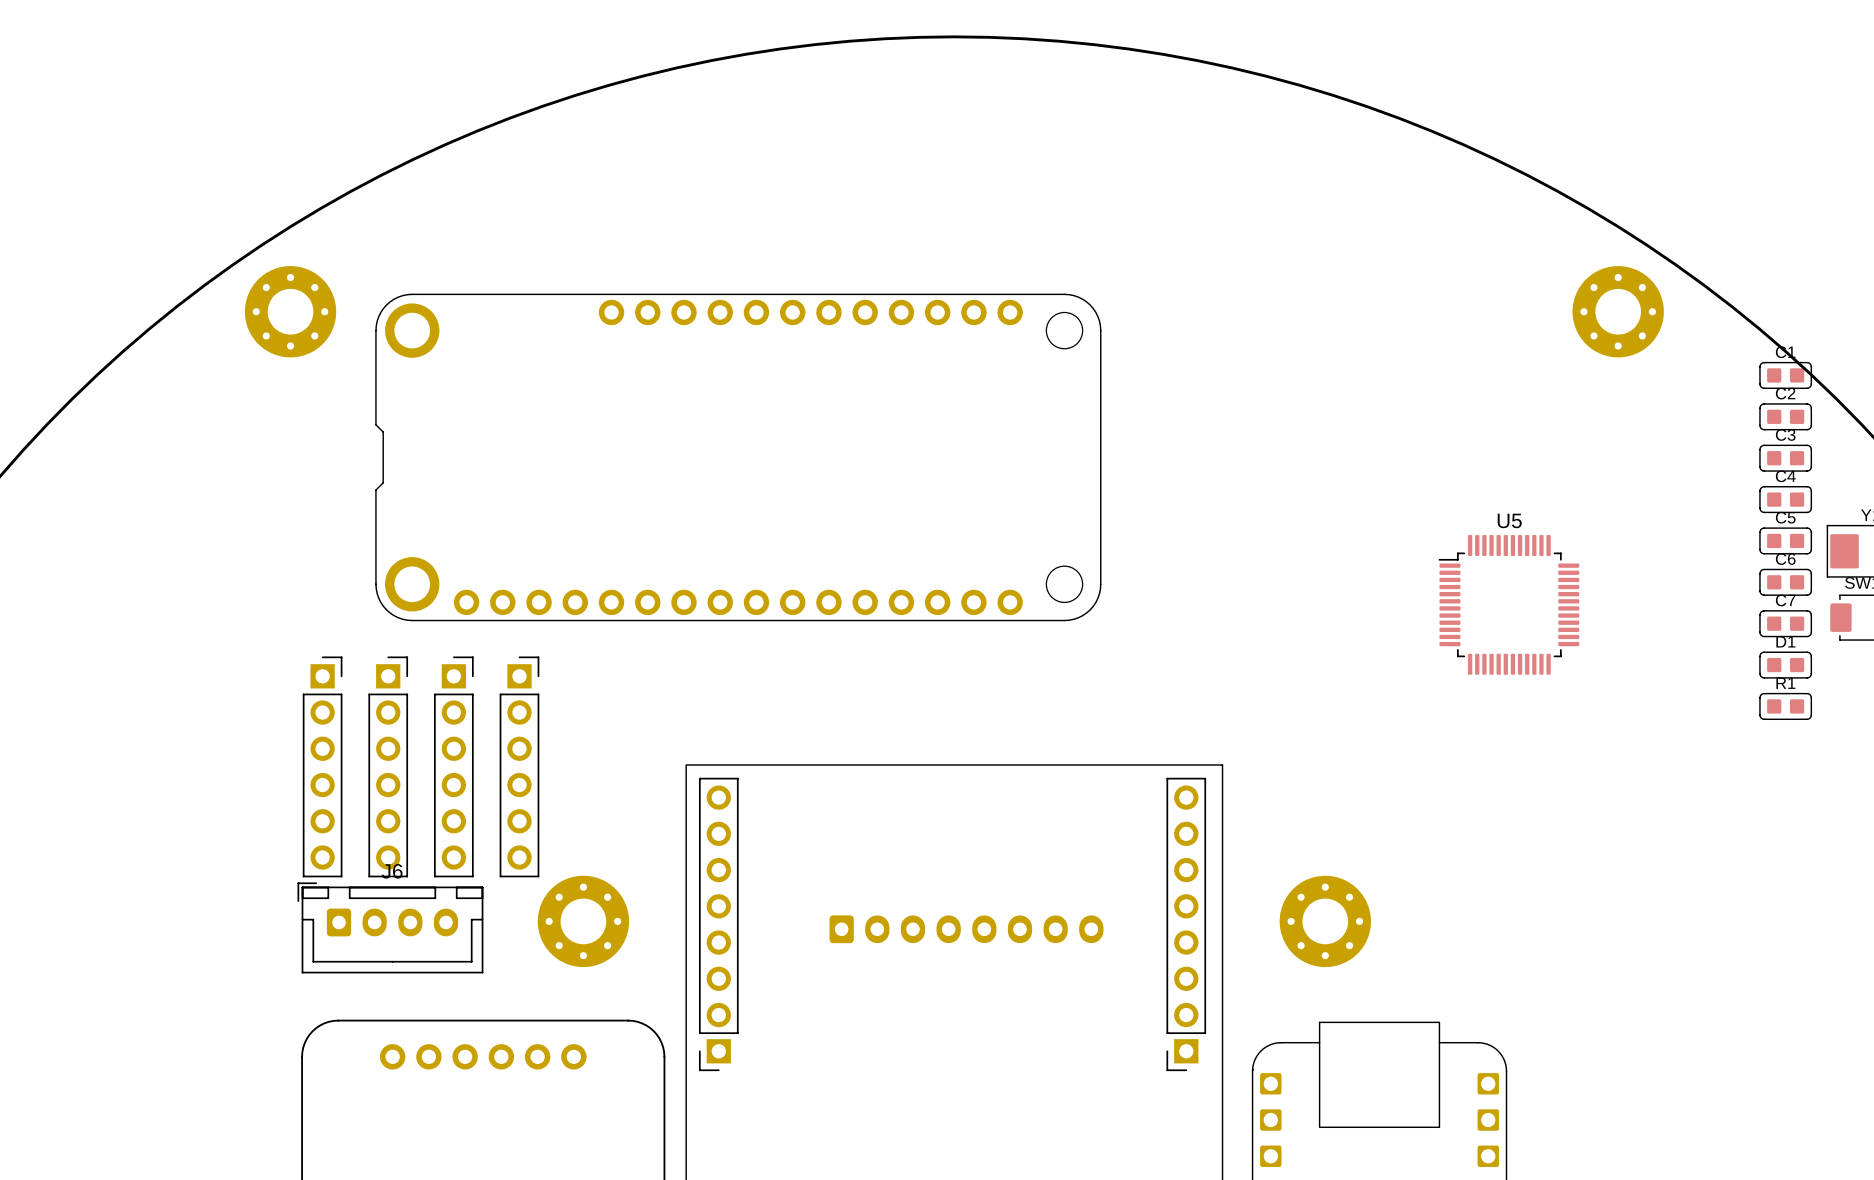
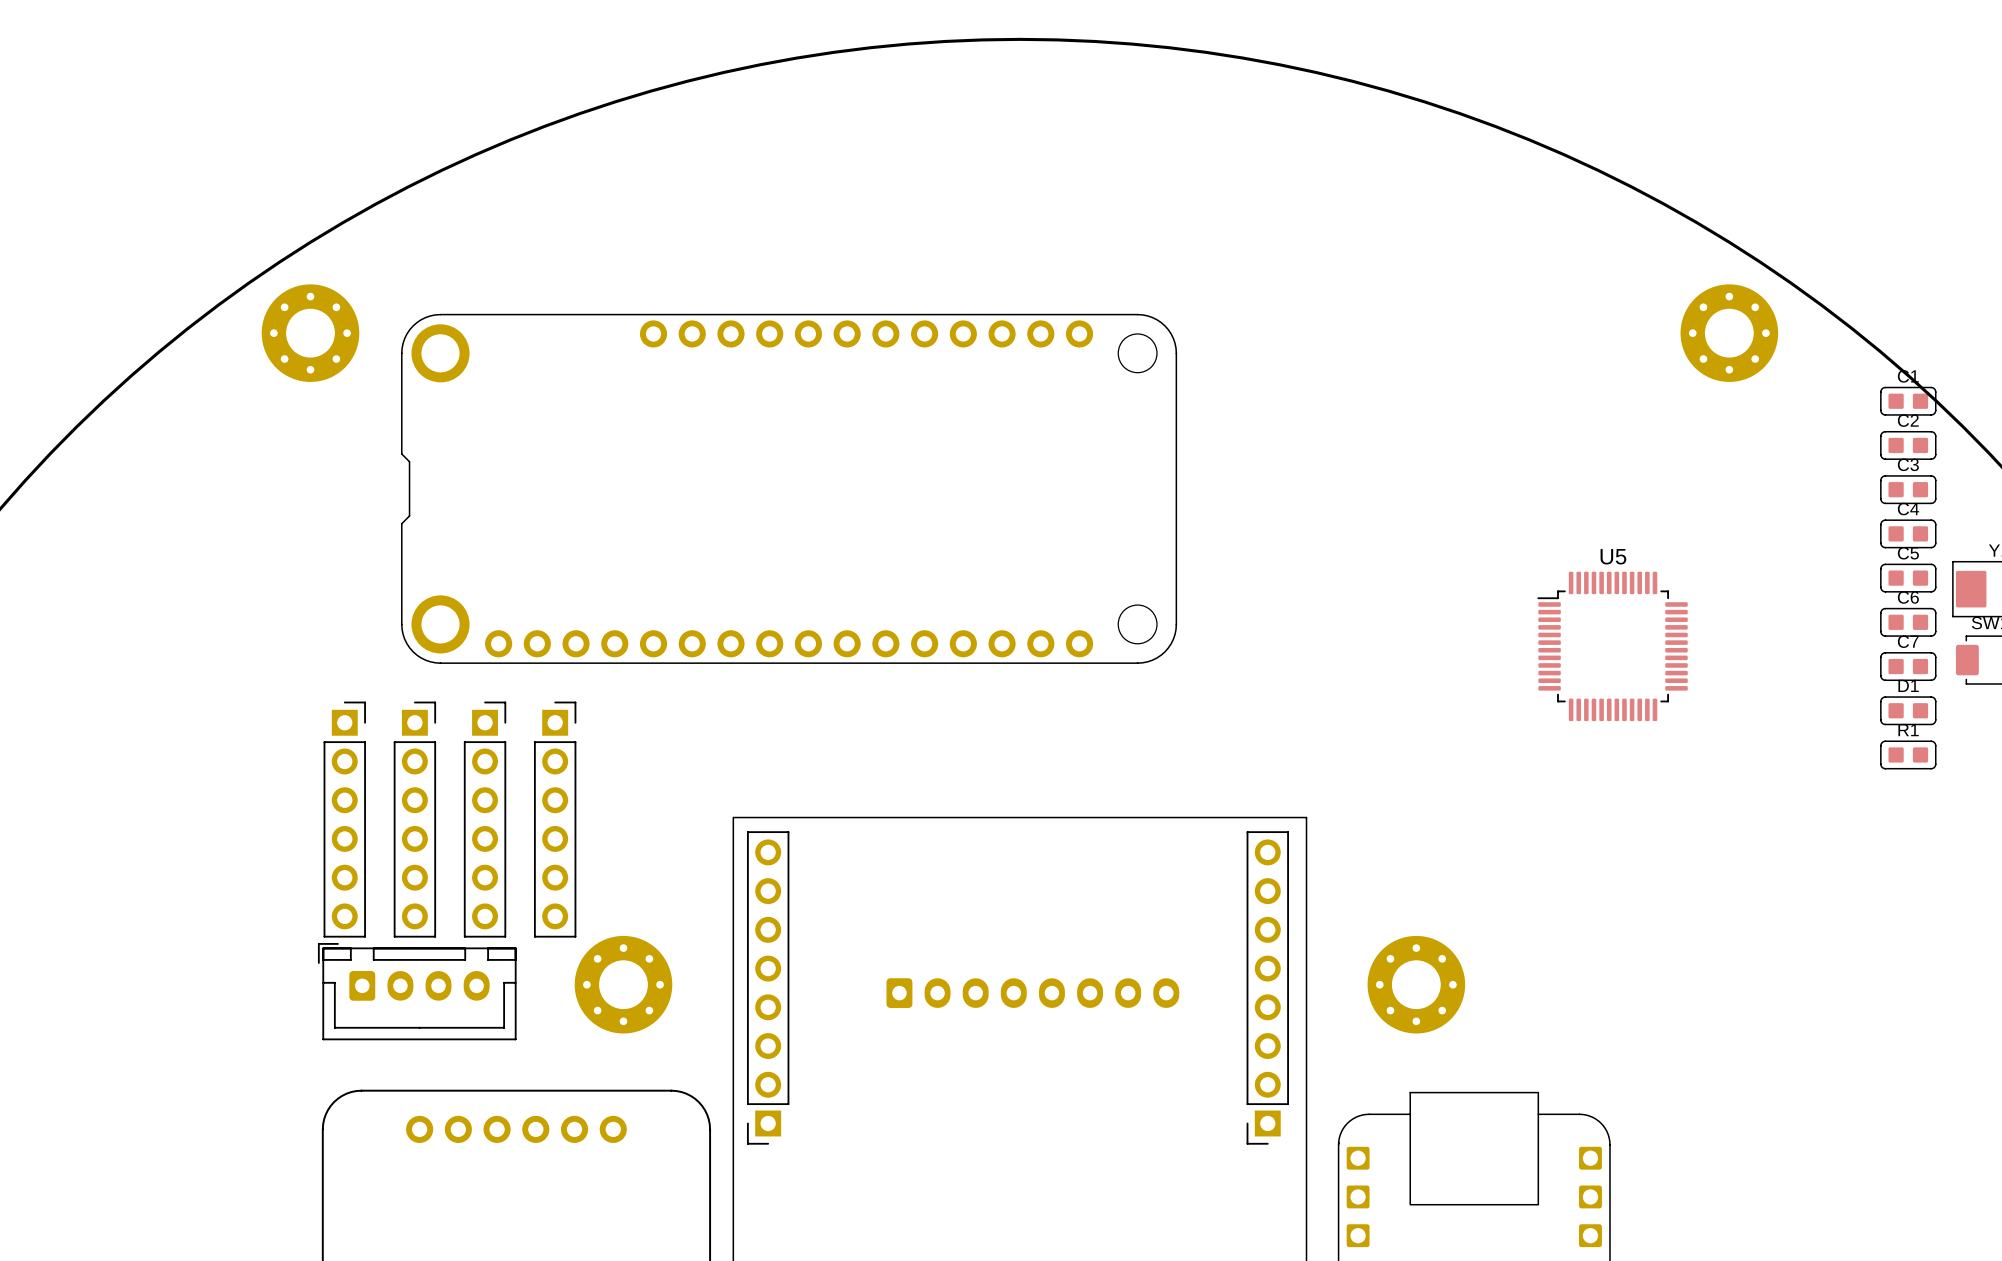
J6 name: J6 (392, 871) -> none

